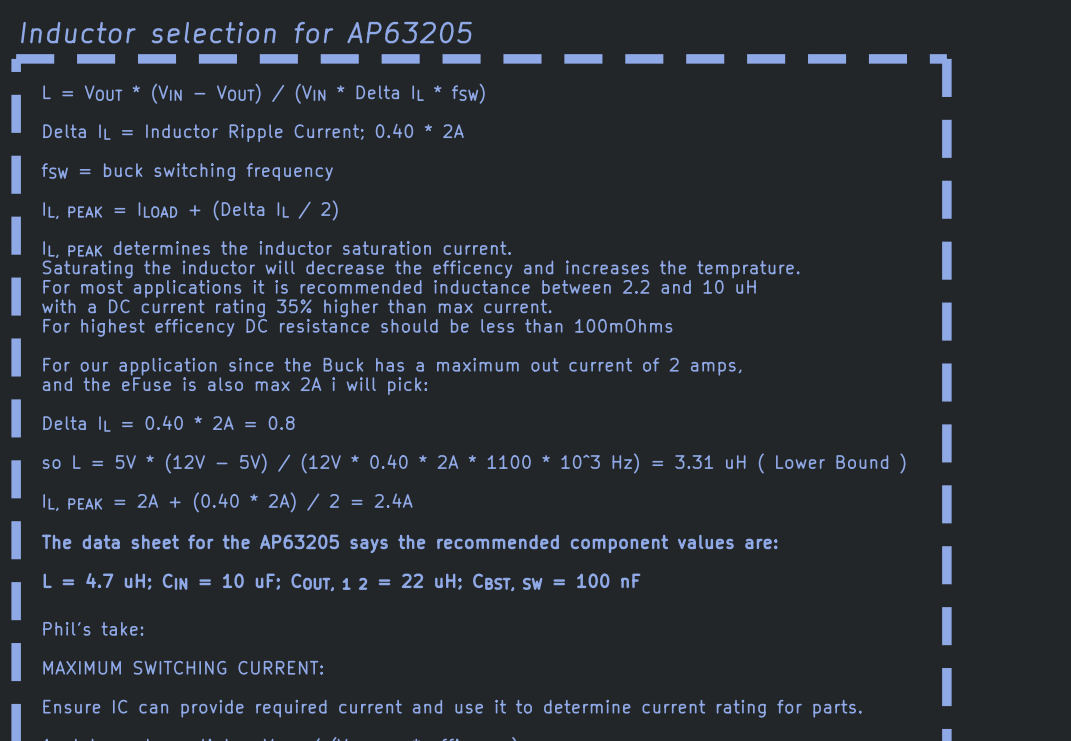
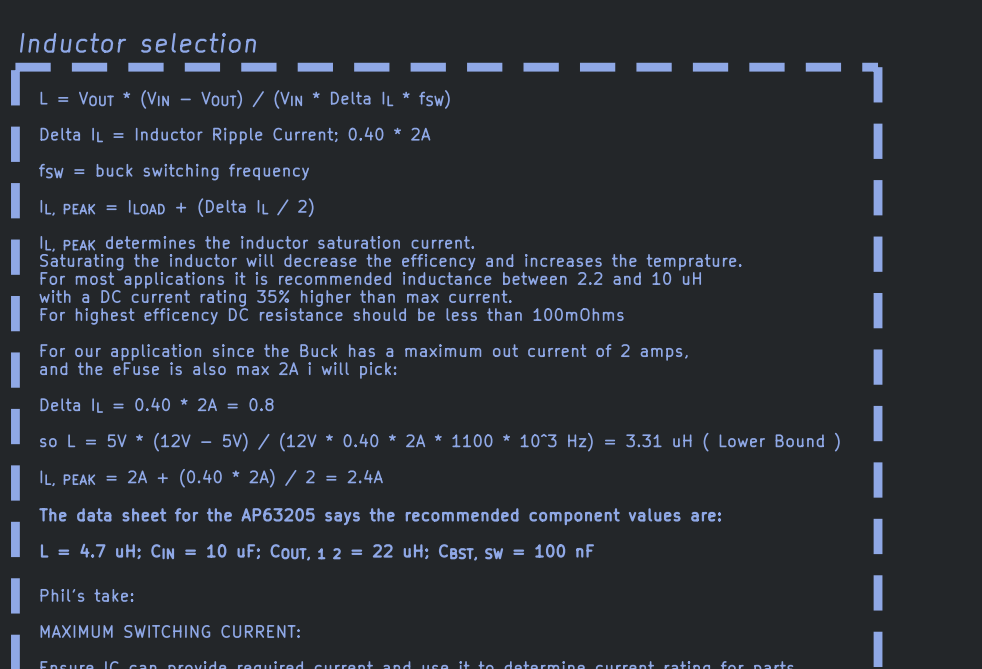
text: Inductor selection for AP63205 (246, 32) -> Inductor selection (138, 42)

